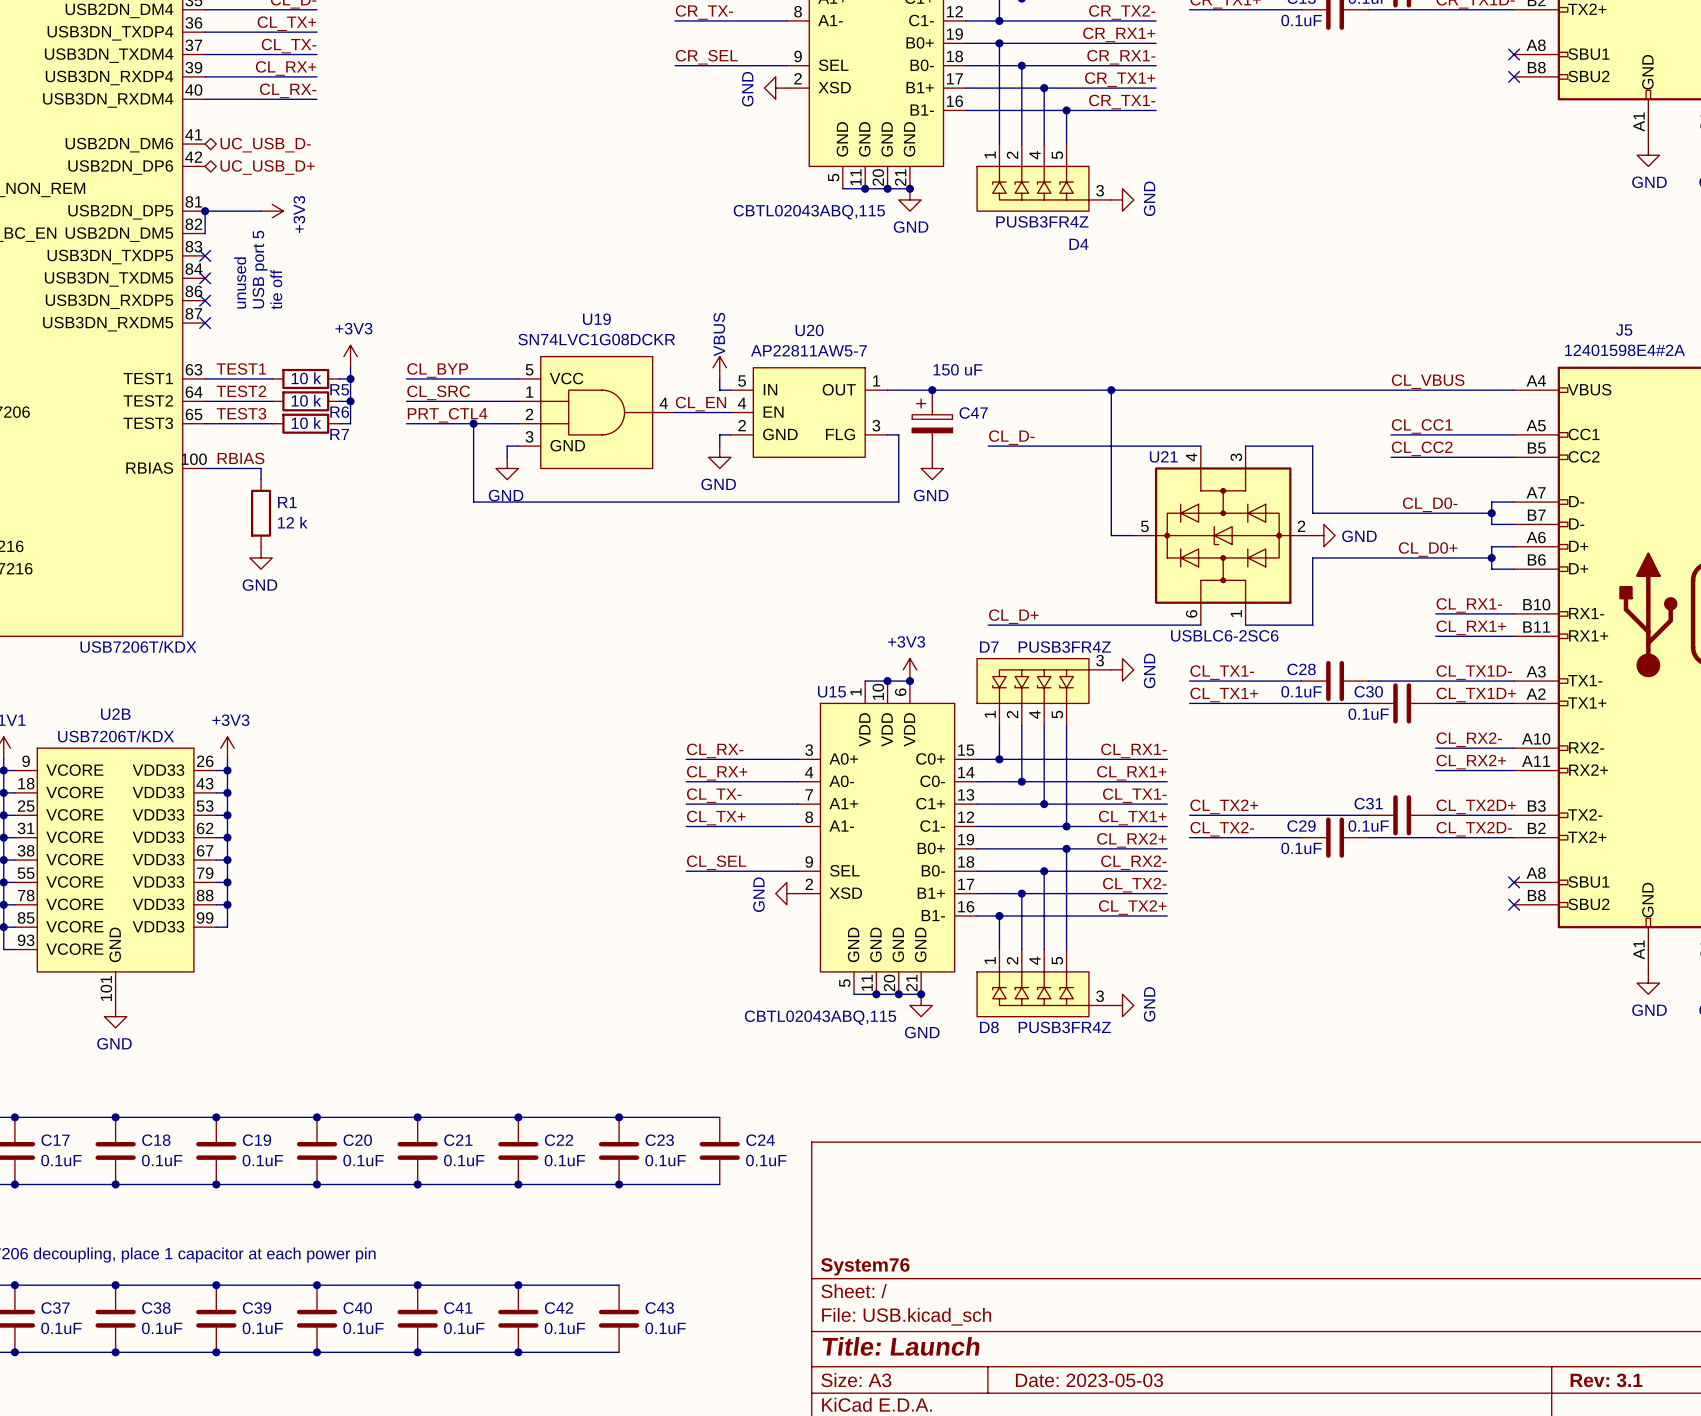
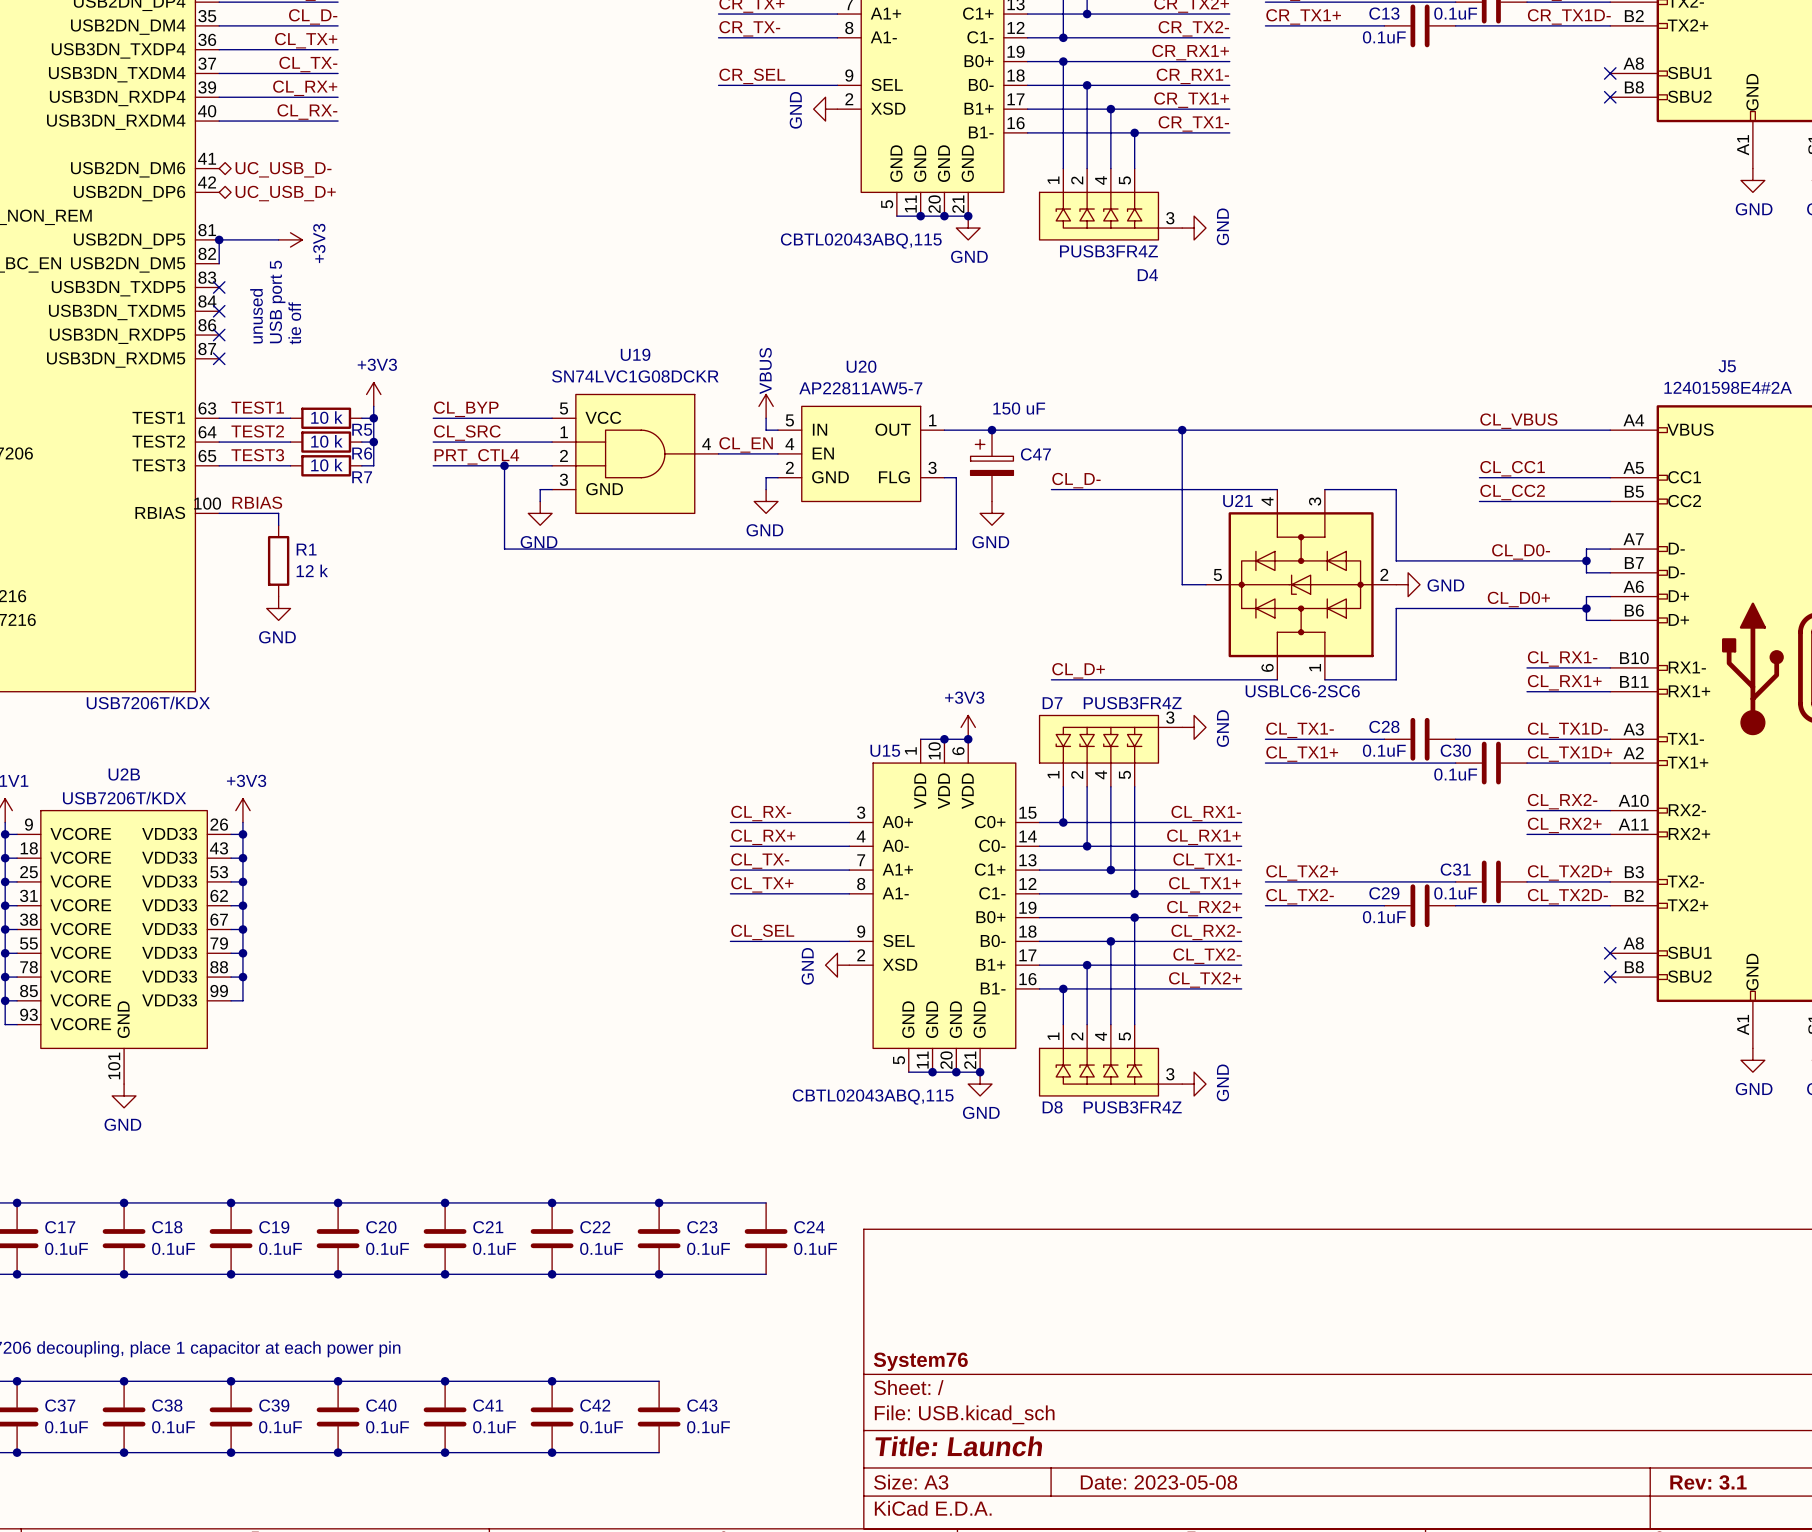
title block: Date: 2023-05-03 (1089, 1380) -> Date: 2023-05-08 (1158, 1482)

